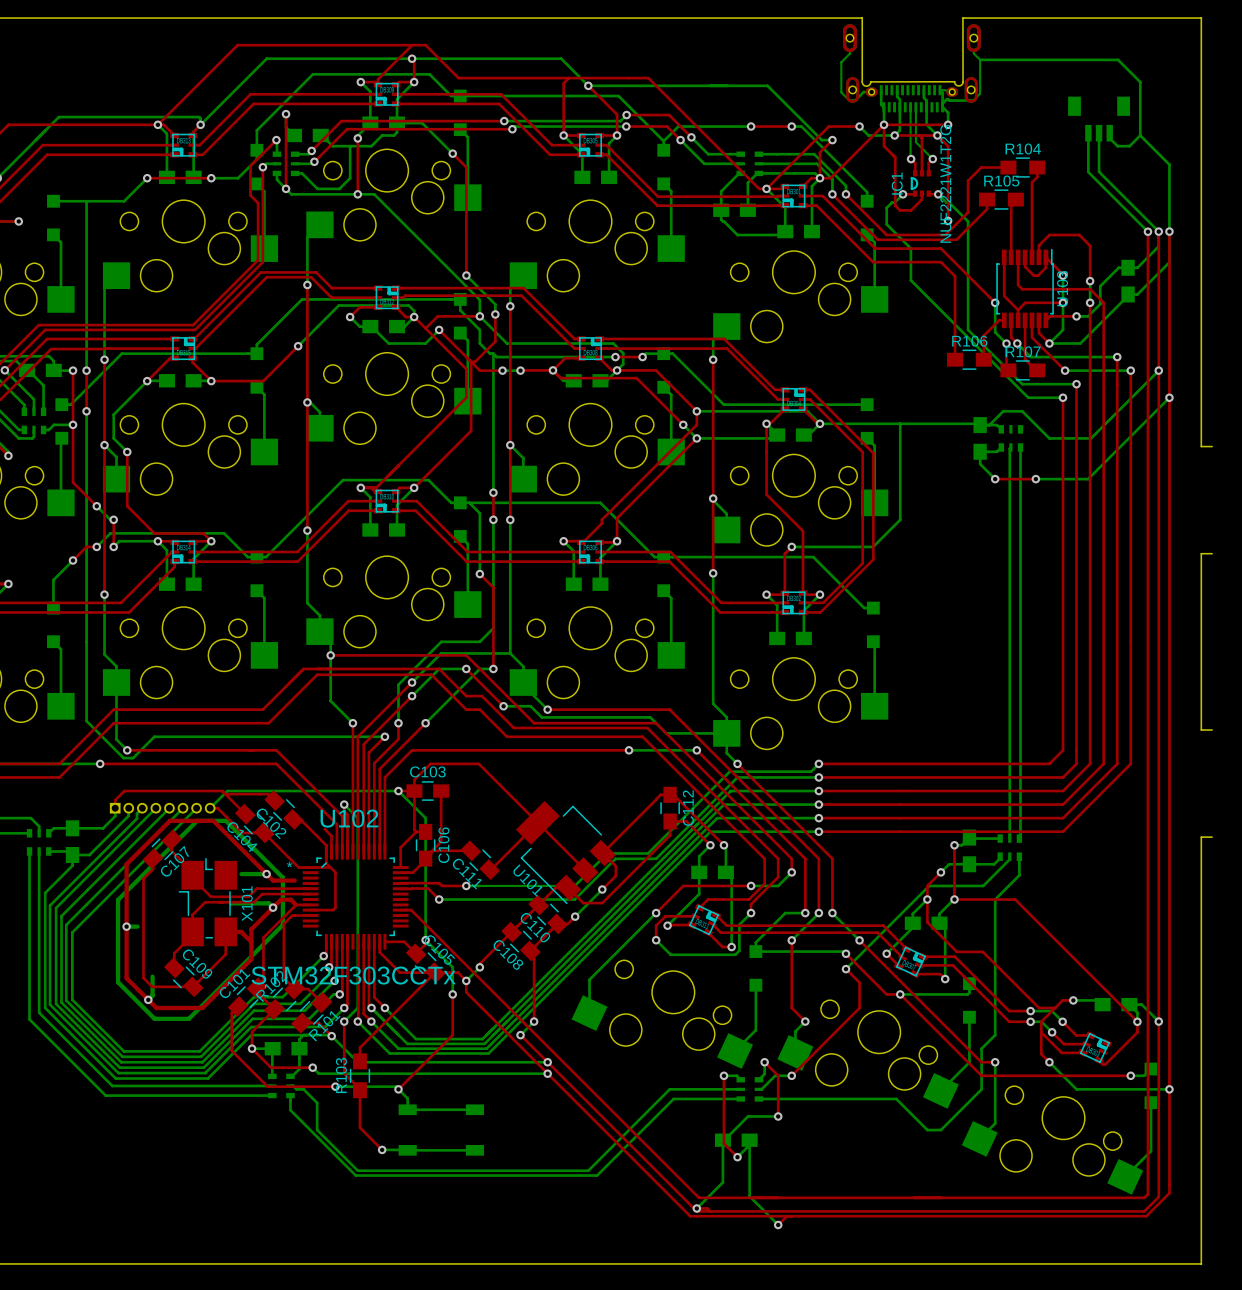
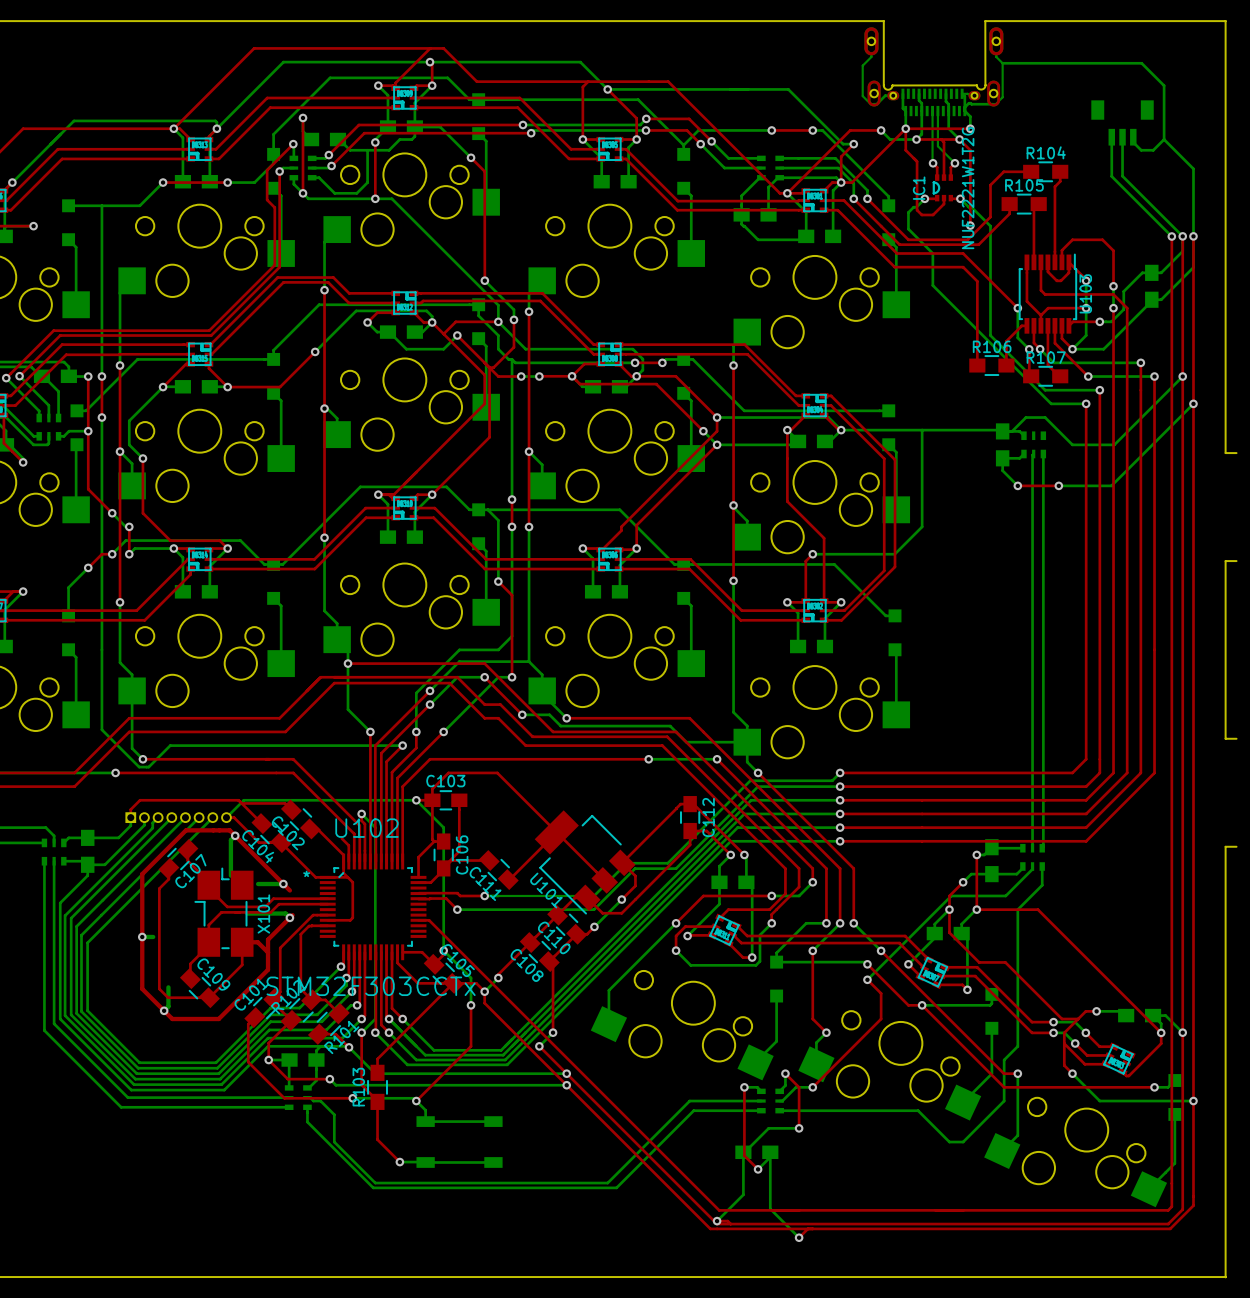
bottom track: (197, 820) (226, 820) (282, 877) (282, 924) (188, 1018) (154, 1018) (118, 982) (118, 899) (197, 820) -> none
bottom track: none -> (235, 835) (230, 840) (230, 875)
via: none -> (235, 835)
top track: (273, 880) (294, 880) -> none
top track: (275, 904) (281, 899) (290, 899) (296, 904) -> none

